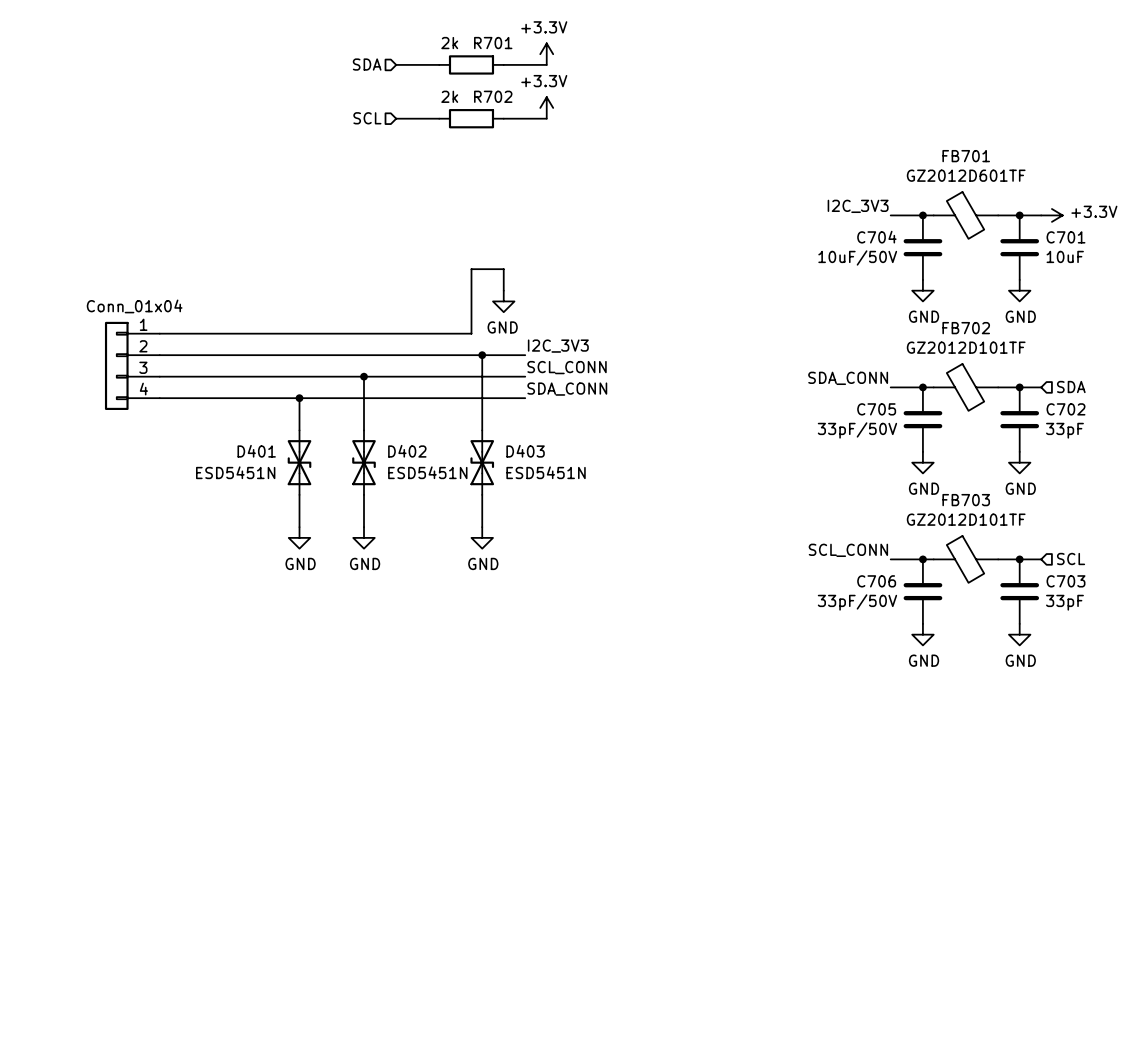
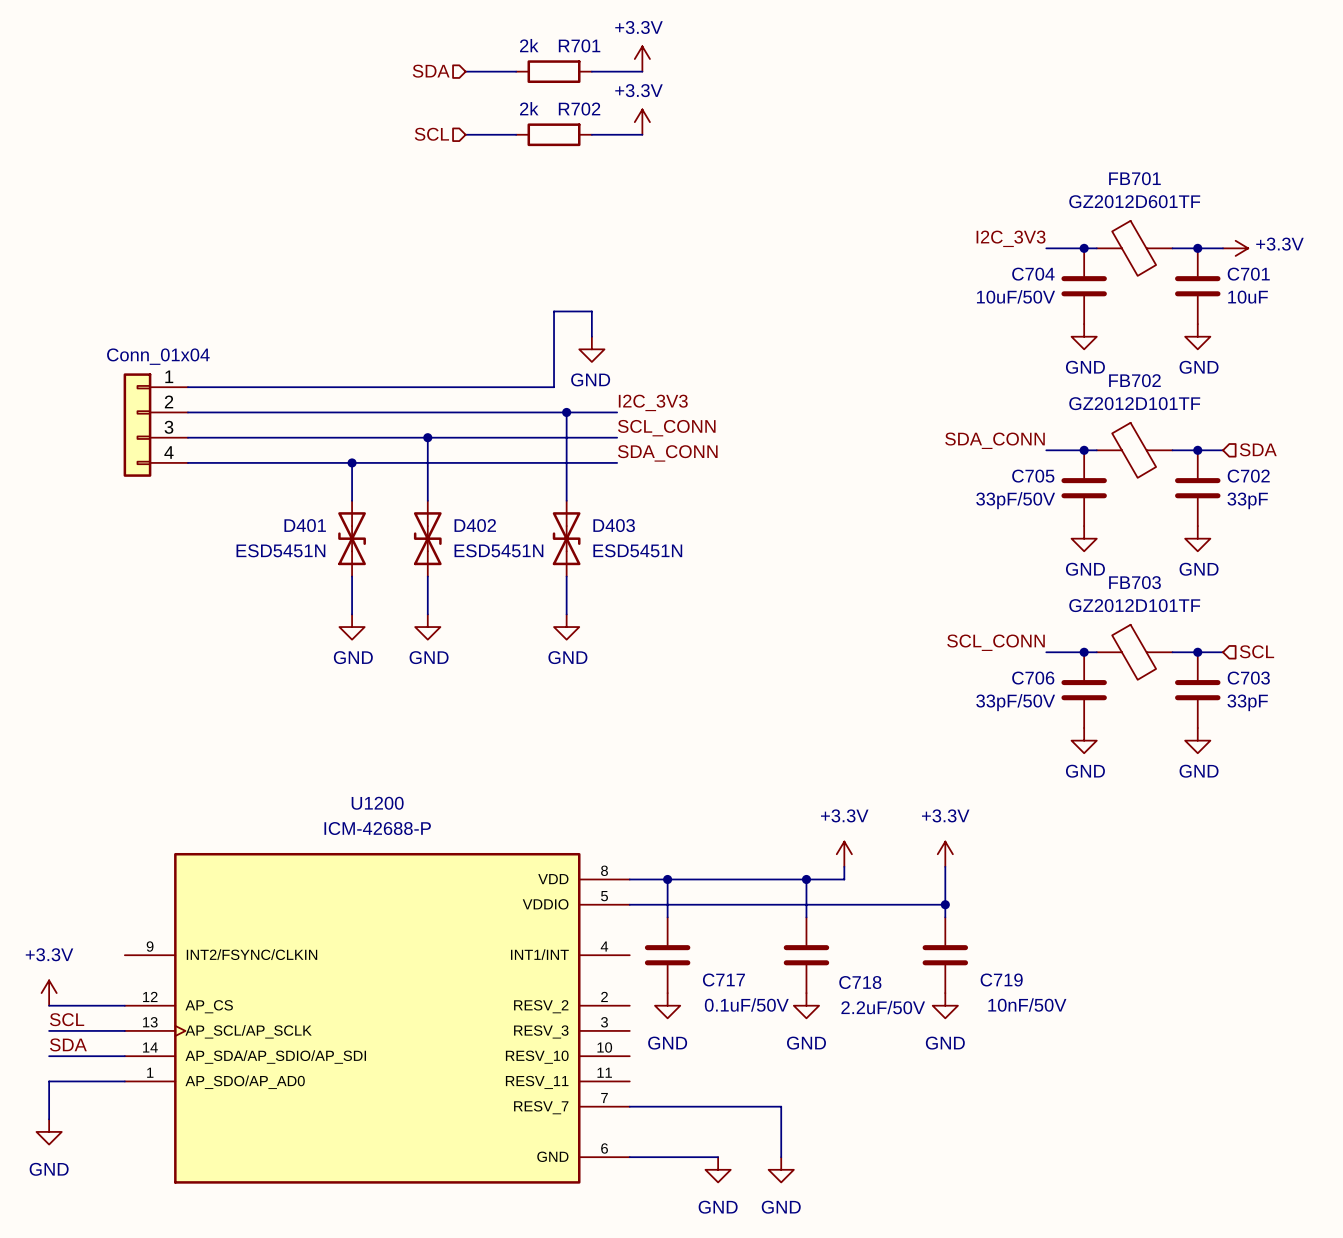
power symbol: none -> +3.3V (844, 854)
power symbol: none -> +3.3V (945, 854)
wire: none -> (844, 866) (844, 879) (629, 879)
wire: none -> (945, 866) (945, 917)
wire: none -> (667, 879) (667, 917)
junction: none -> (667, 879)
wire: none -> (806, 879) (806, 917)
junction: none -> (806, 879)
wire: none -> (629, 904) (945, 904)
junction: none -> (945, 904)
C717: none -> 0.1uF/50V (667, 955)
C718: none -> 2.2uF/50V (806, 955)
C719: none -> 10nF/50V (945, 955)
power symbol: none -> +3.3V (49, 993)
wire: none -> (49, 1005) (124, 1005)
power symbol: none -> GND (667, 1005)
power symbol: none -> GND (806, 1005)
power symbol: none -> GND (945, 1005)
U1200: none -> ICM-42688-P (377, 1018)
label: none -> SCL (67, 1019)
wire: none -> (49, 1030) (124, 1030)
label: none -> SDA (68, 1044)
wire: none -> (49, 1056) (124, 1056)
wire: none -> (124, 1081) (49, 1081) (49, 1119)
wire: none -> (629, 1106) (781, 1106) (781, 1157)
power symbol: none -> GND (49, 1131)
wire: none -> (629, 1157) (718, 1157)
power symbol: none -> GND (718, 1169)
power symbol: none -> GND (781, 1169)

